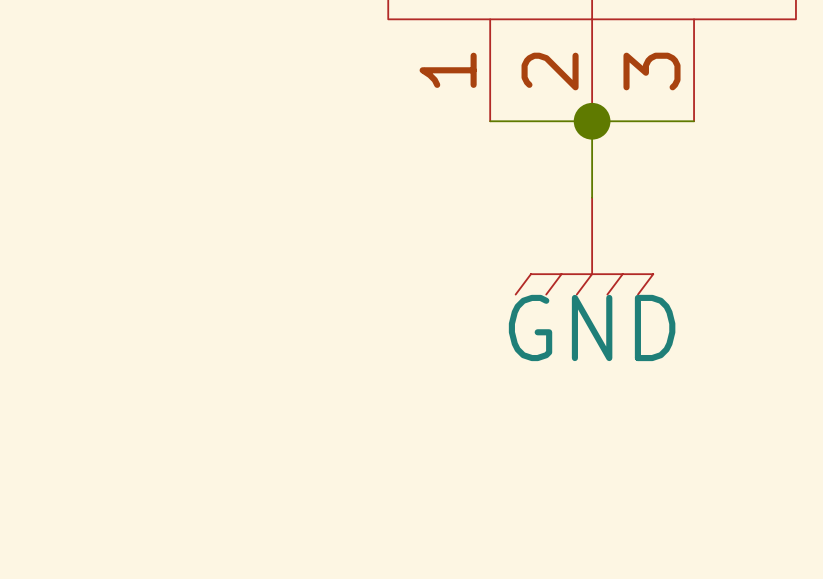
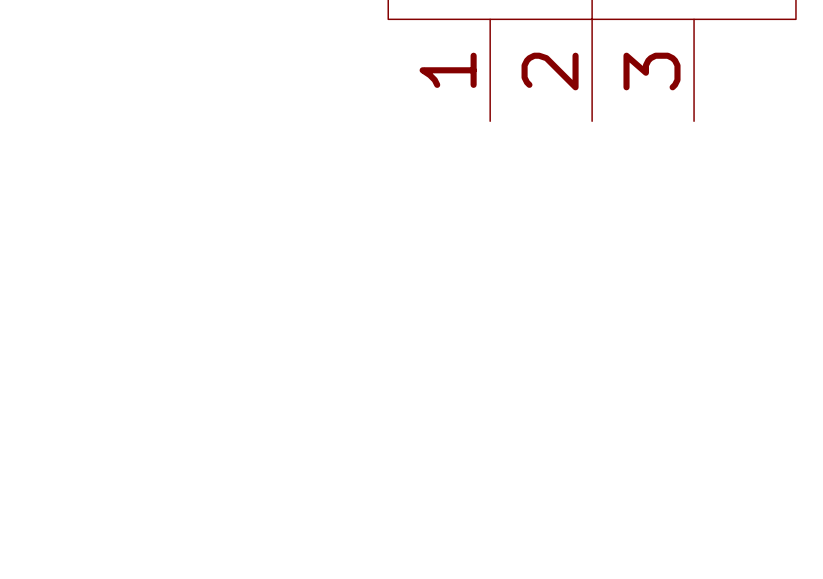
wire: (490, 121) (694, 121) -> none
wire: (592, 121) (592, 197) -> none
junction: (592, 121) -> none
power symbol: GND (584, 246) -> none

